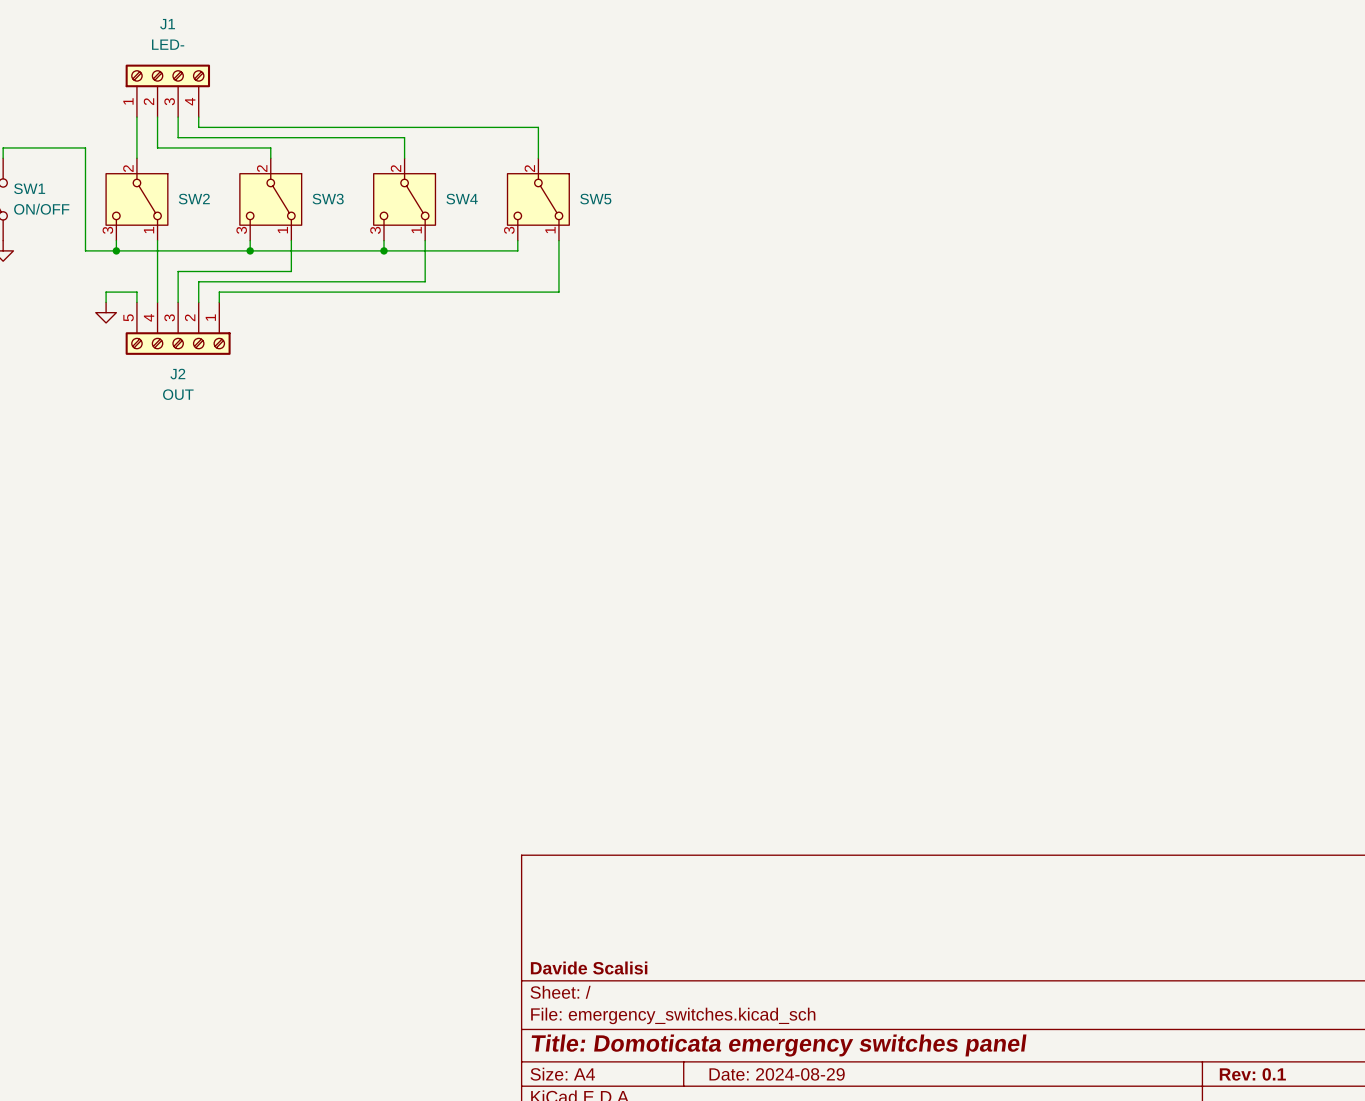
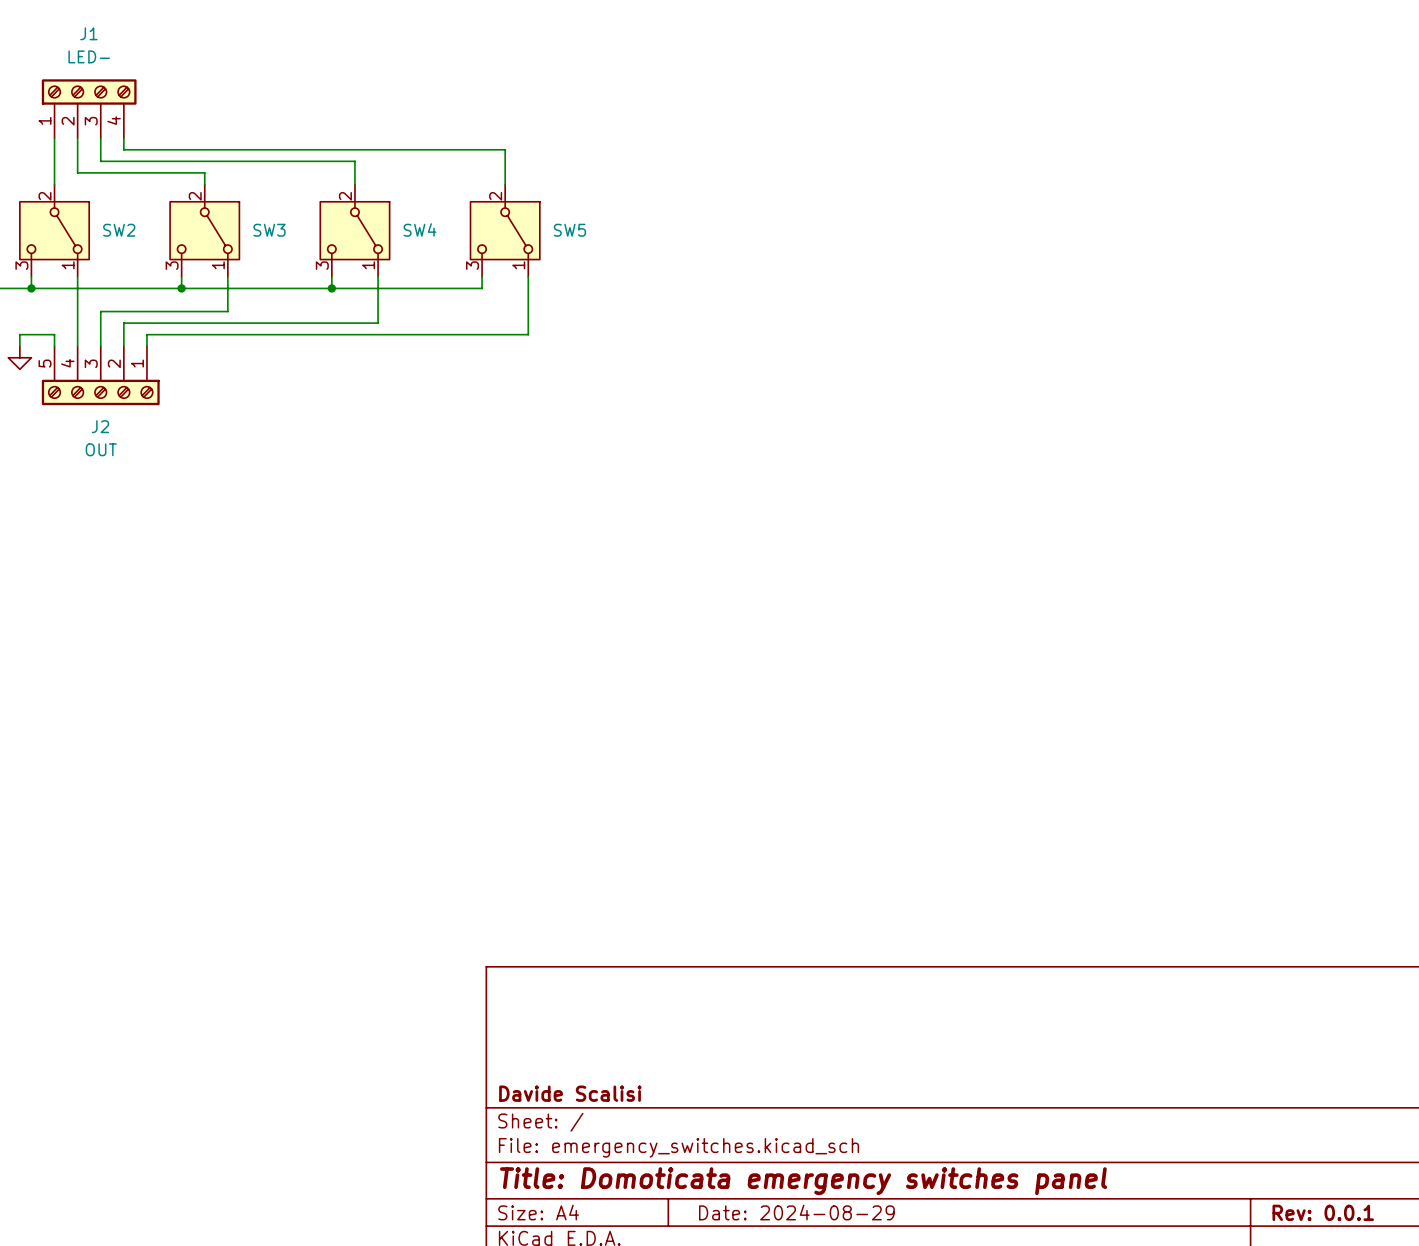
title block: Rev: 0.1 (1252, 1074) -> Rev: 0.0.1 (1323, 1212)

